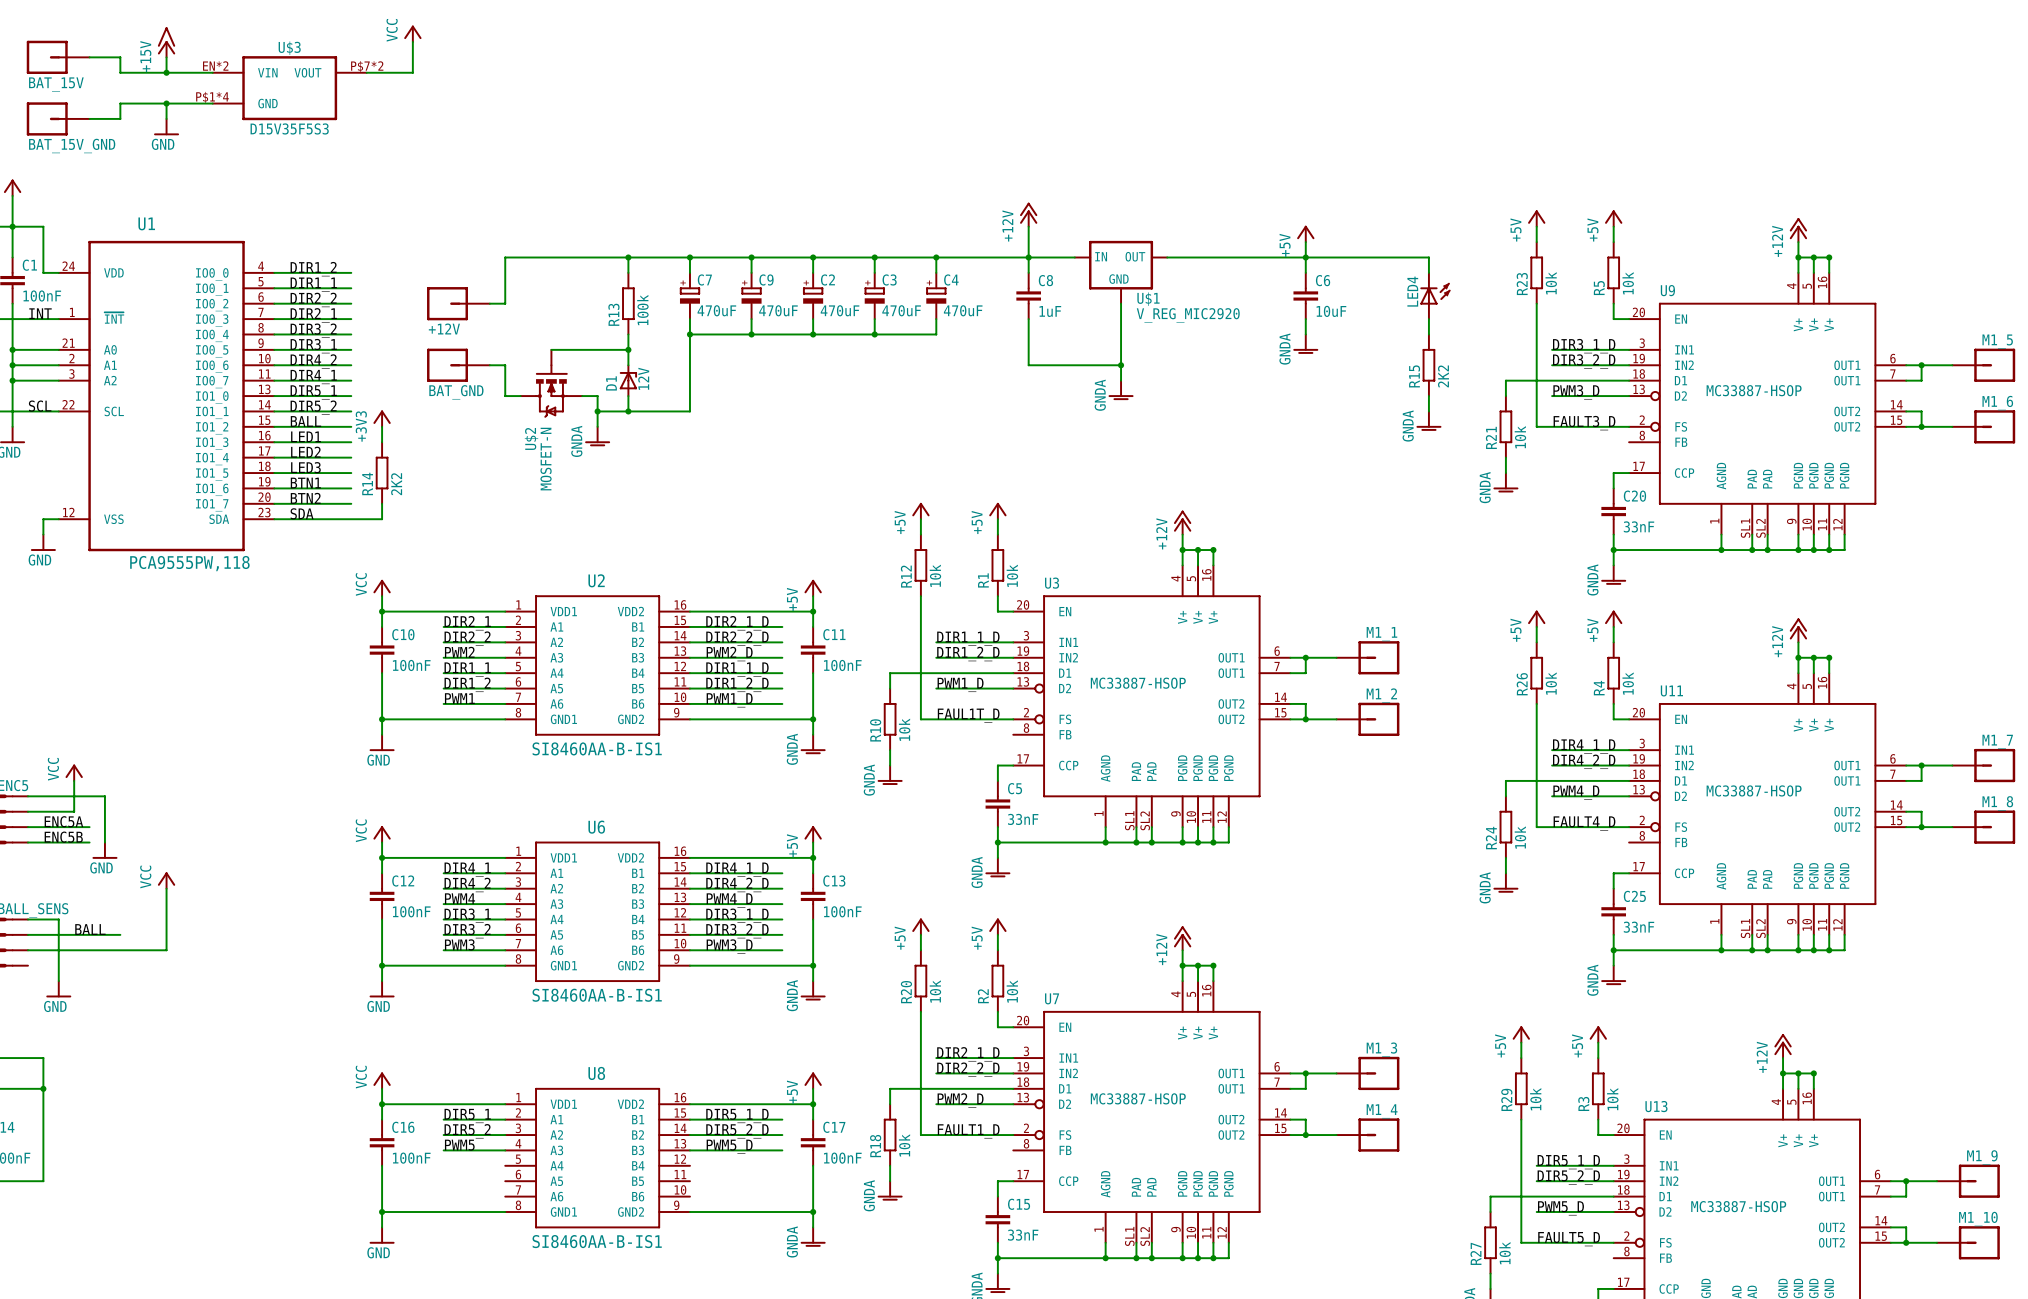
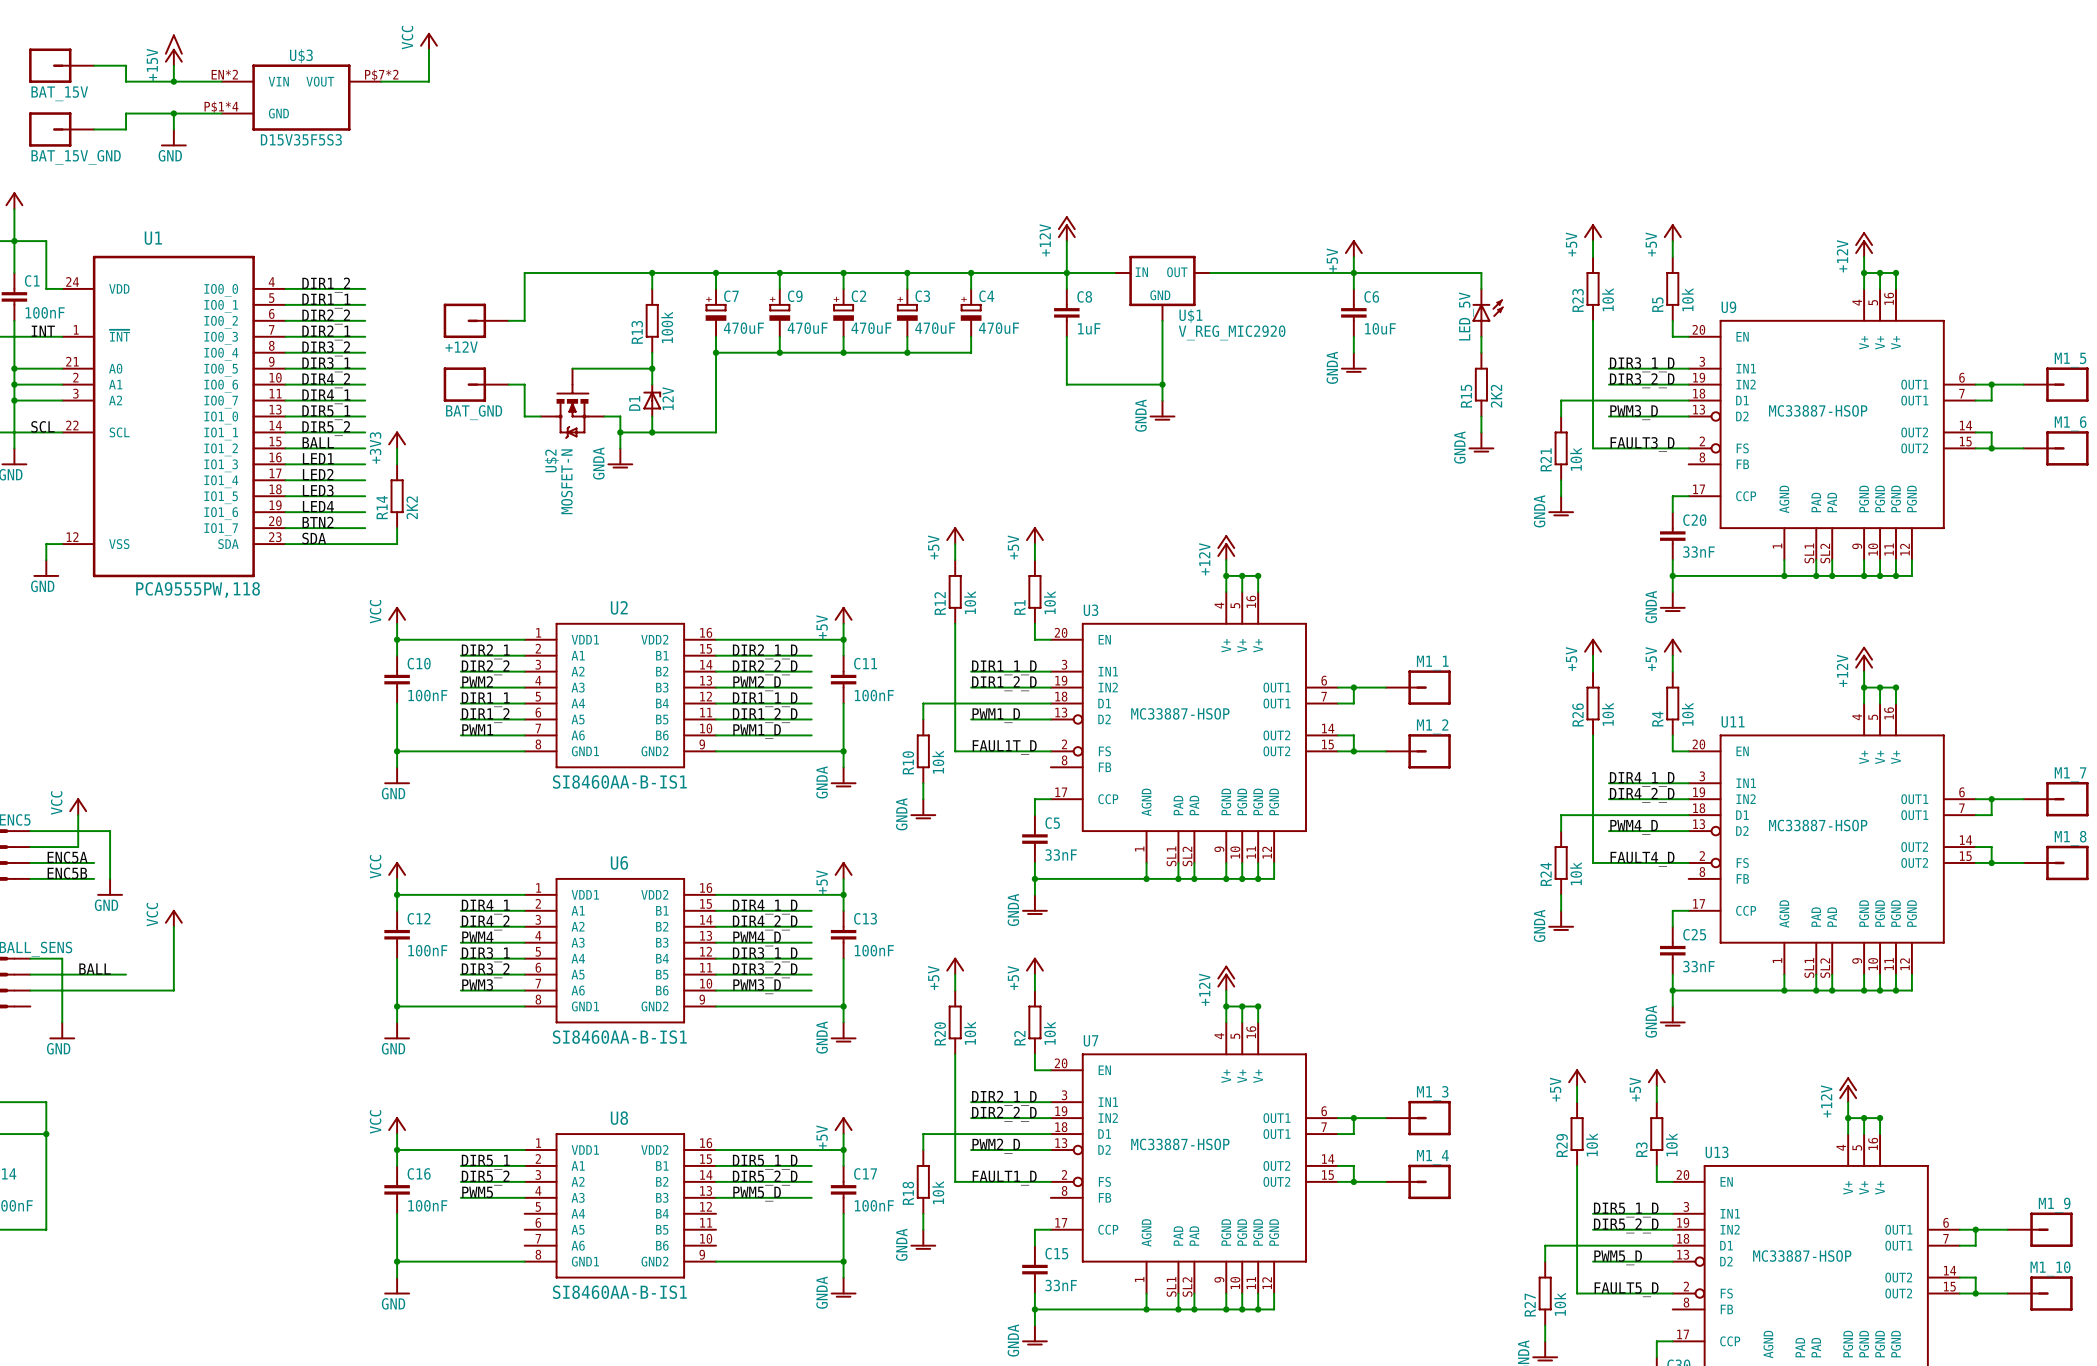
LED4 name: LED4 (1412, 291) -> LED_5V (1466, 316)
label: BTN1 (305, 483) -> LED4 (318, 506)

